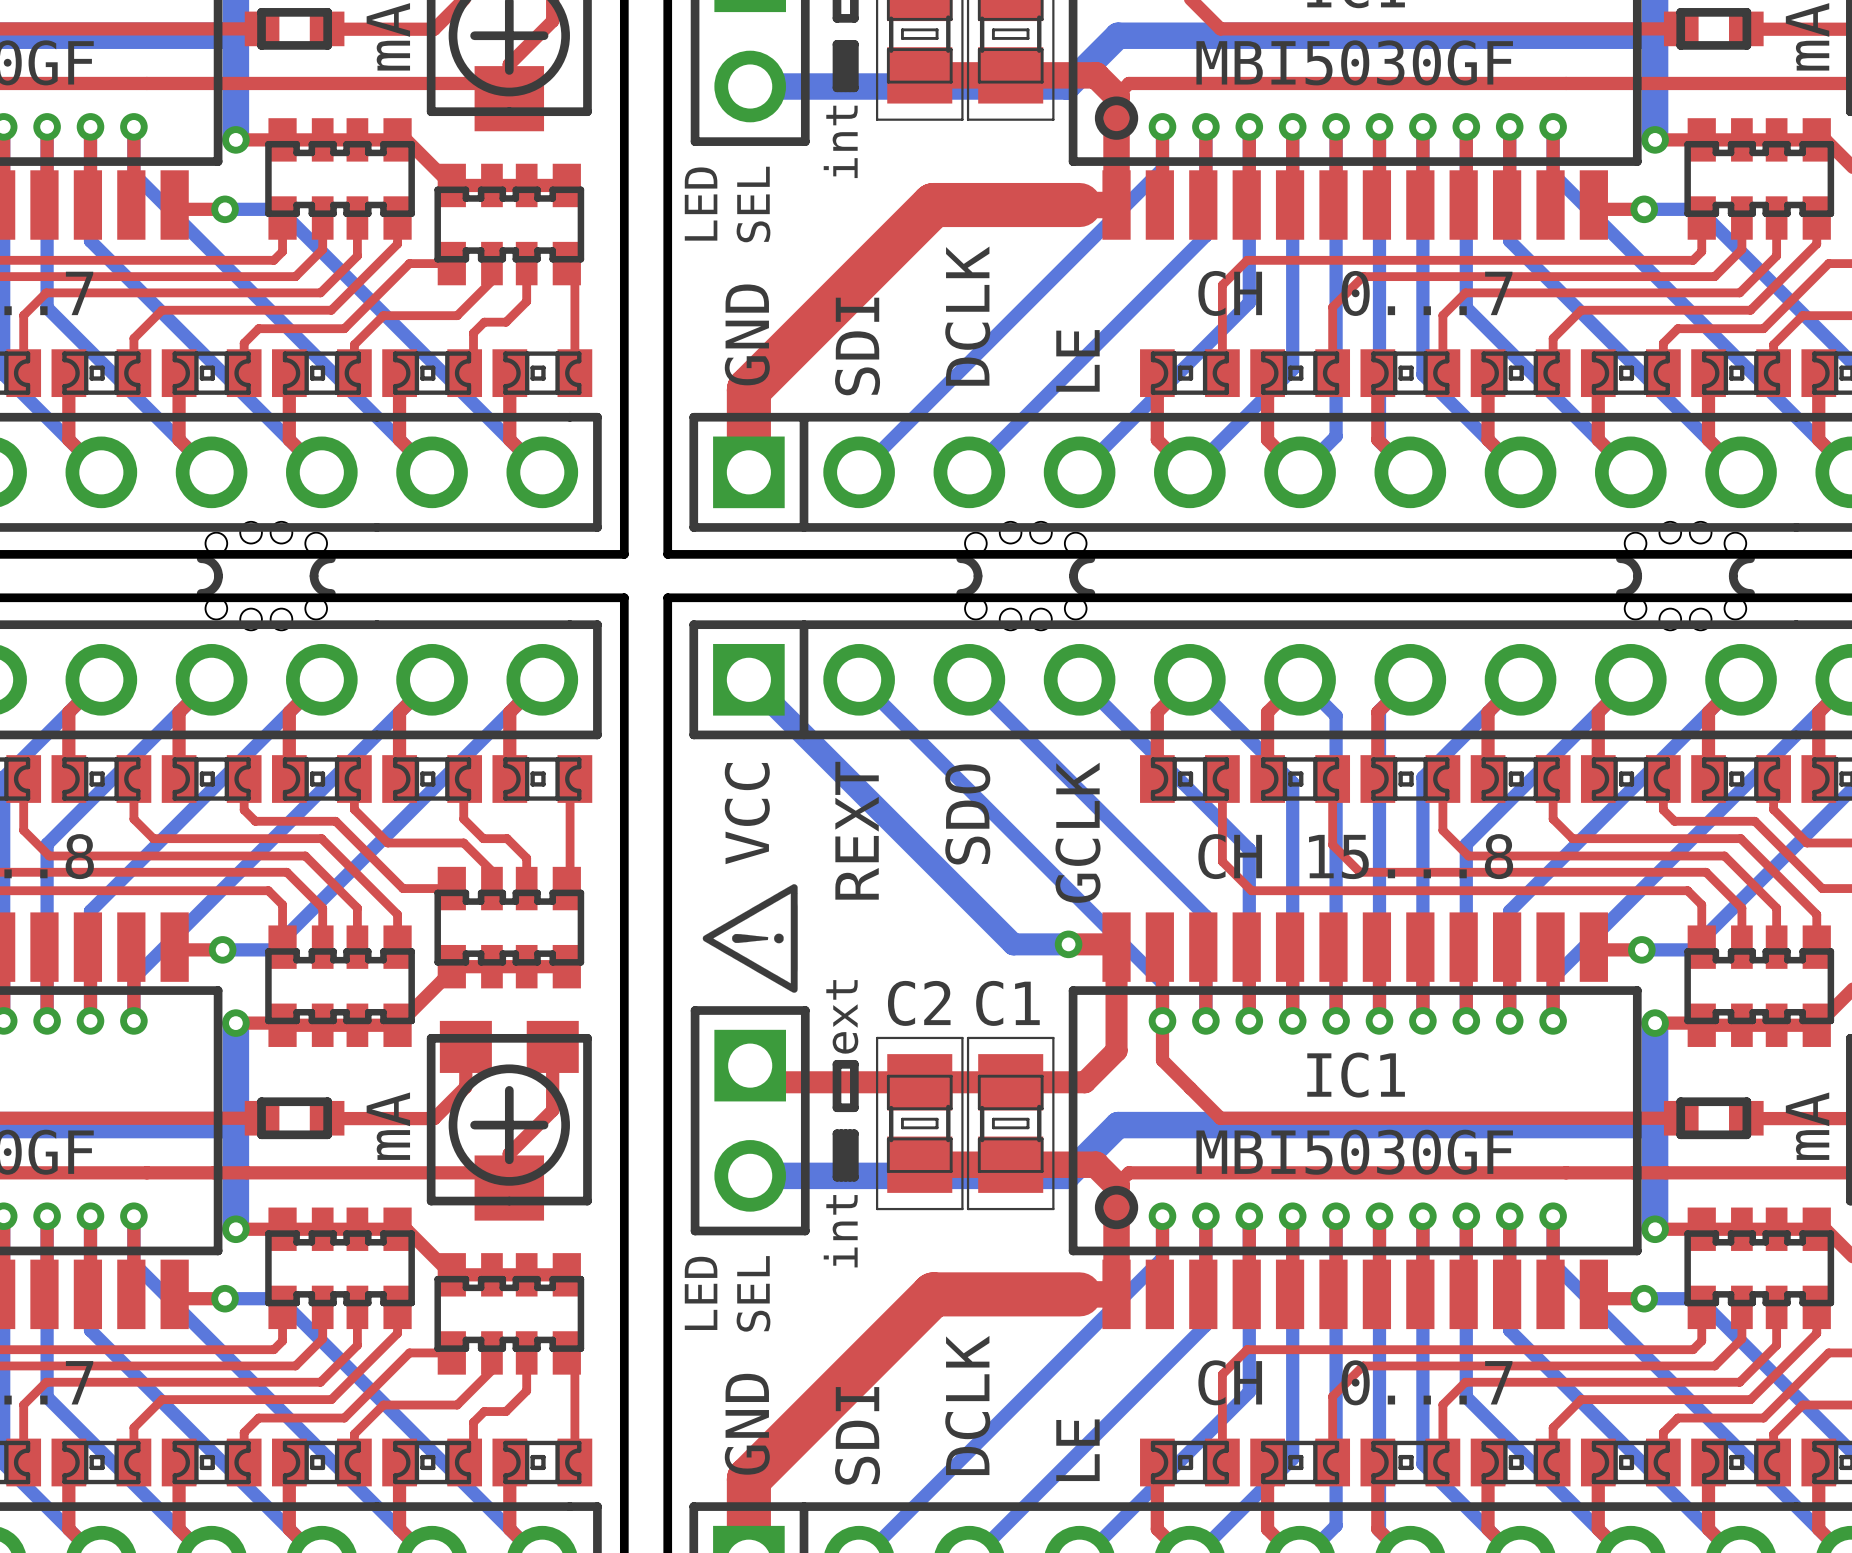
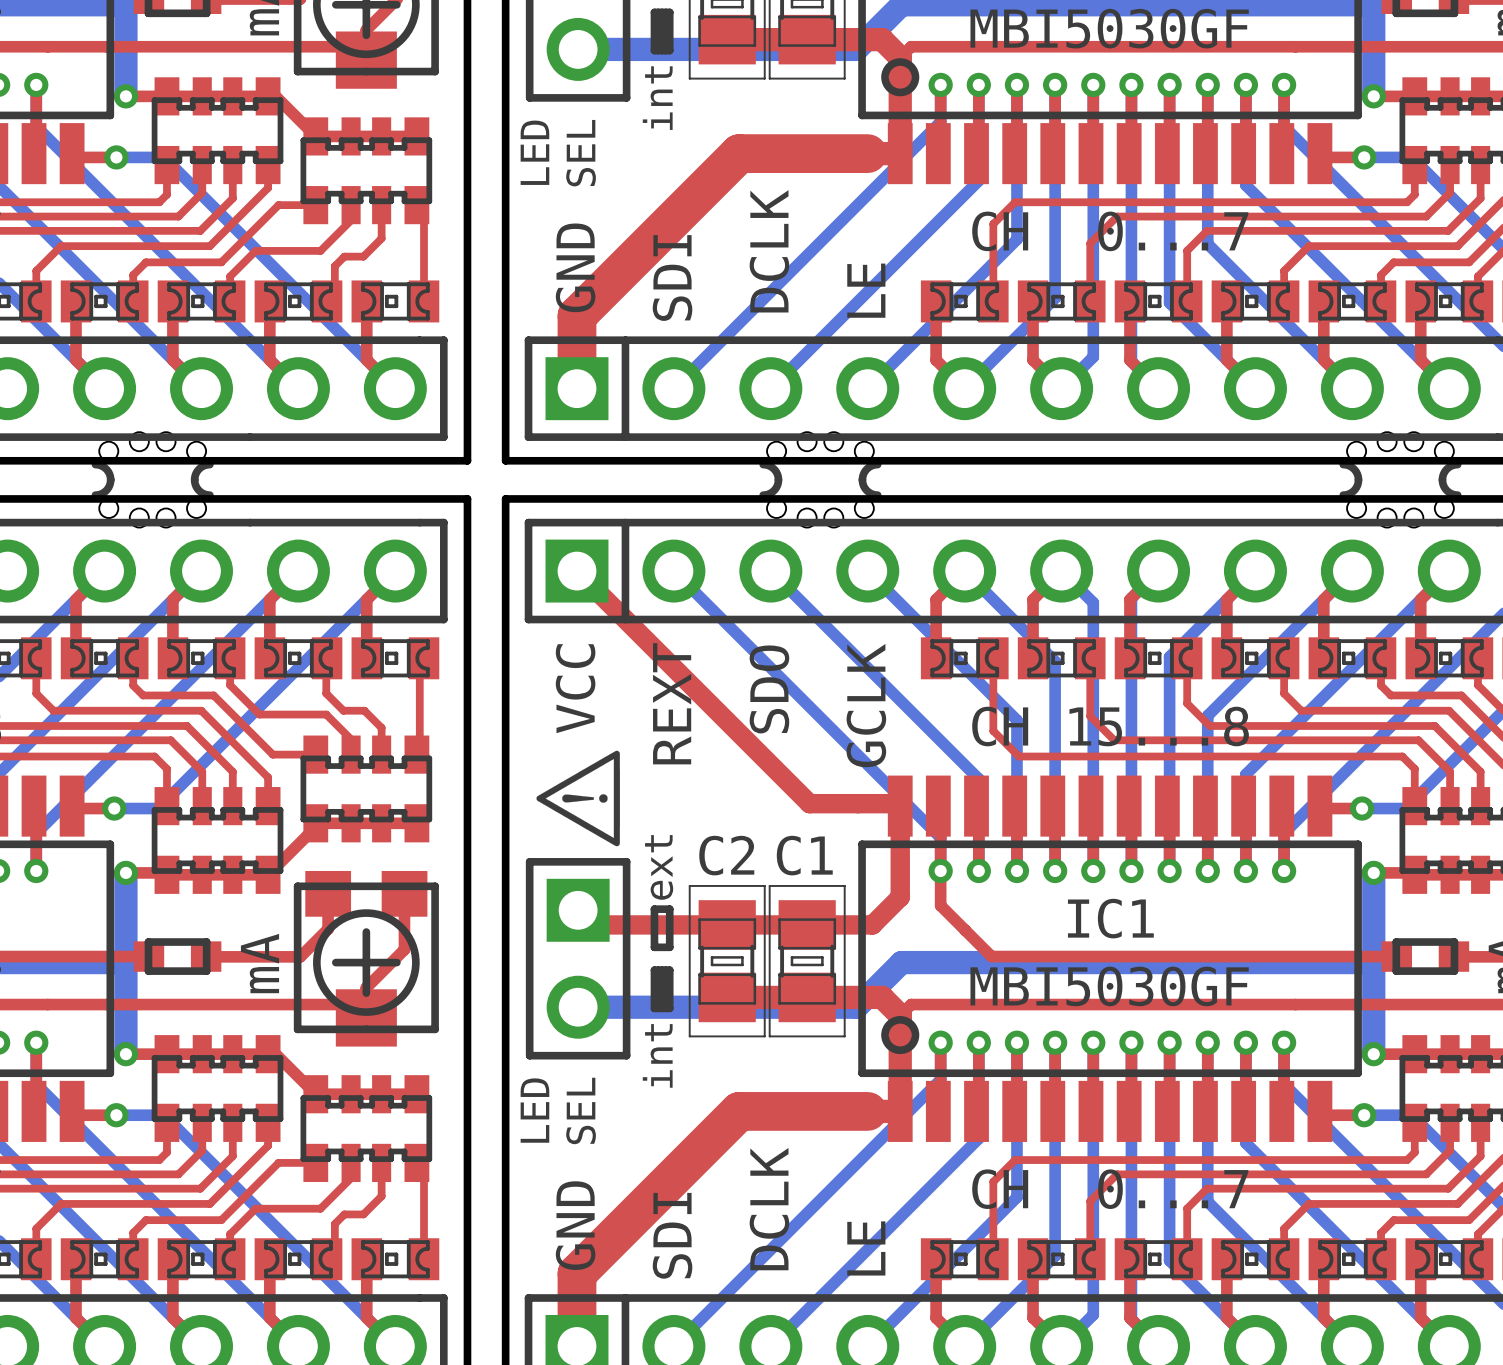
top track: none -> (576, 571) (809, 803) (858, 803)
bottom track: (748, 679) (1013, 944) (1068, 944) -> none
via: (1068, 944) -> none

